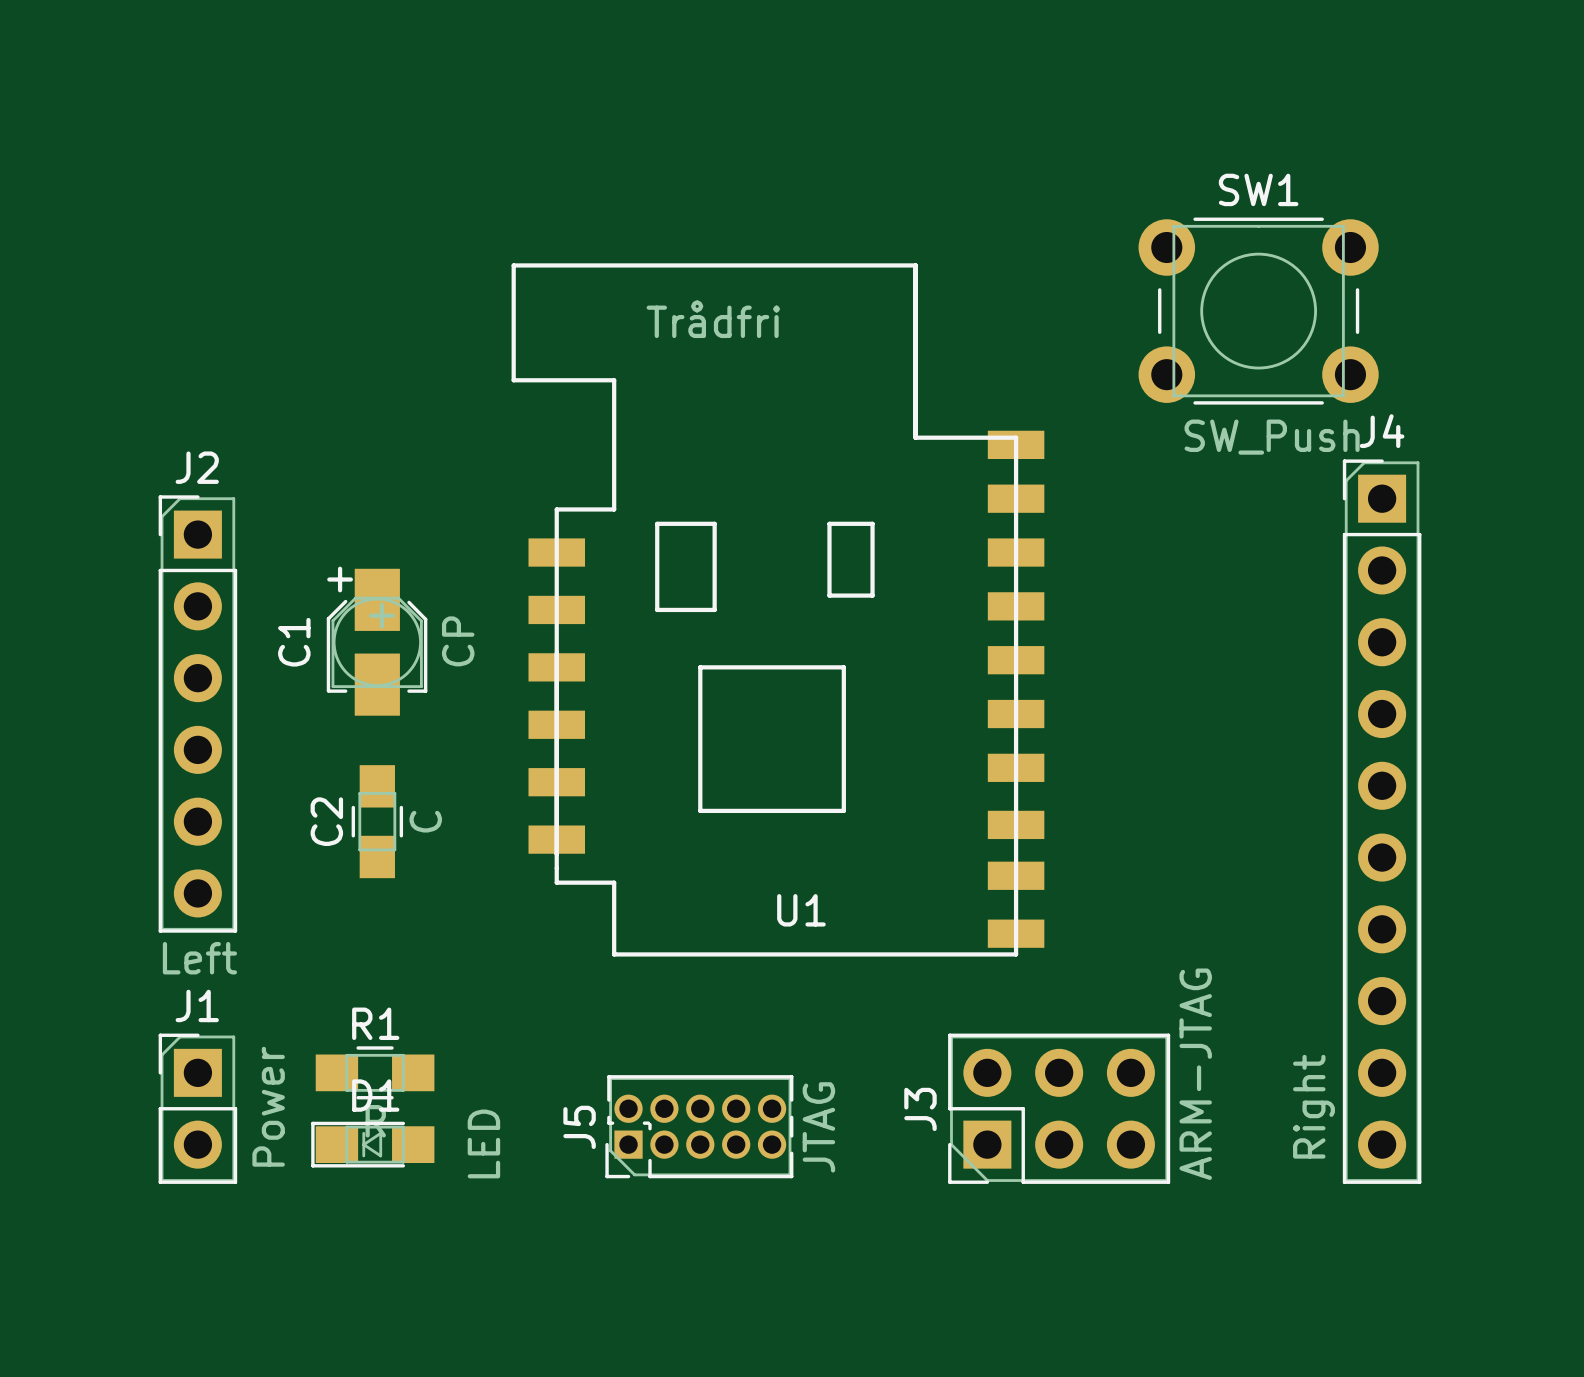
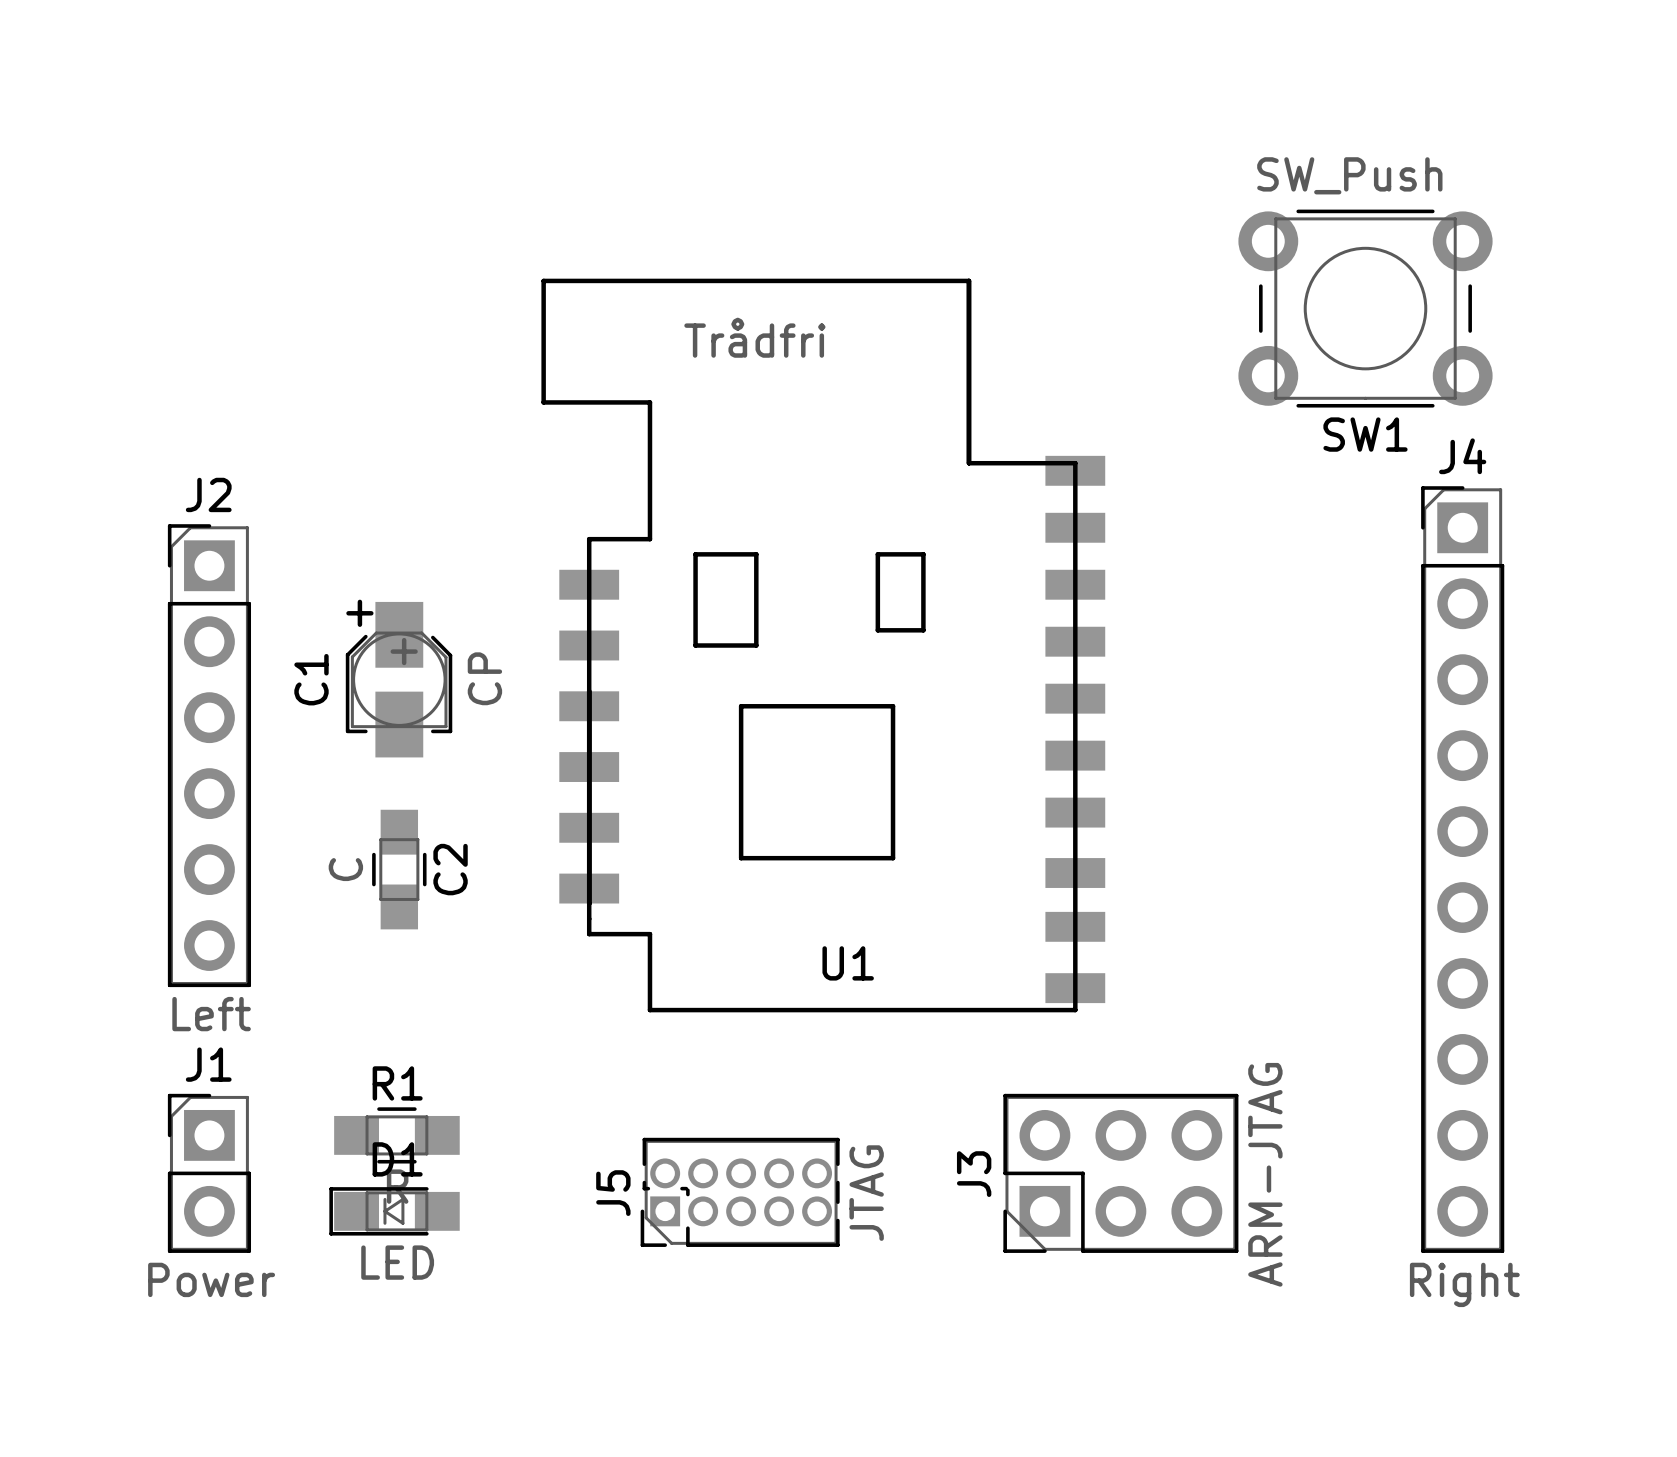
SW1 rotation: 0° (1258, 311) -> 180° (1365, 308)
C2 name position: C2 (326, 821) -> C2 (450, 869)
C2 value position: C (425, 821) -> C (345, 869)
J3 value position: ARM-JTAG (1195, 1074) -> ARM-JTAG (1265, 1174)
J1 value rotation: 0° (268, 1106) -> 90° clockwise (211, 1279)
J4 value rotation: 0° (1313, 1106) -> 90° clockwise (1464, 1284)
D1 value rotation: 0° (483, 1143) -> 90° clockwise (397, 1262)
D1 value position: LED (483, 1143) -> LED (397, 1262)

